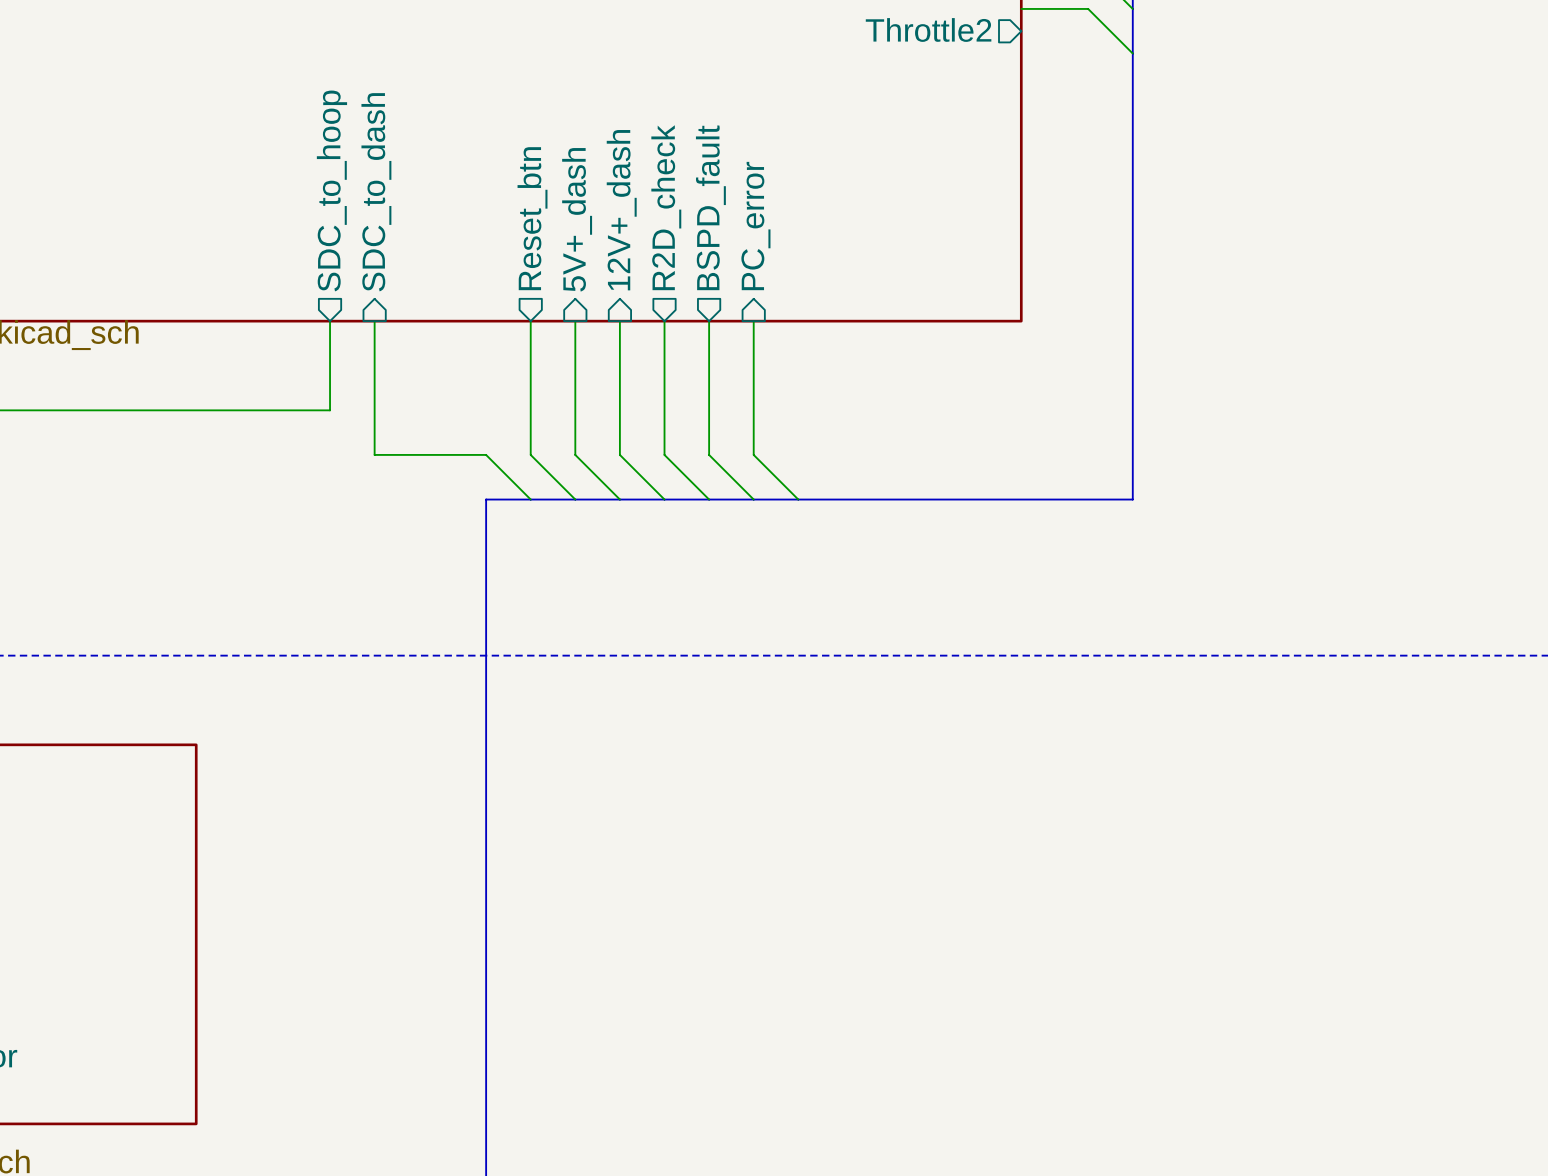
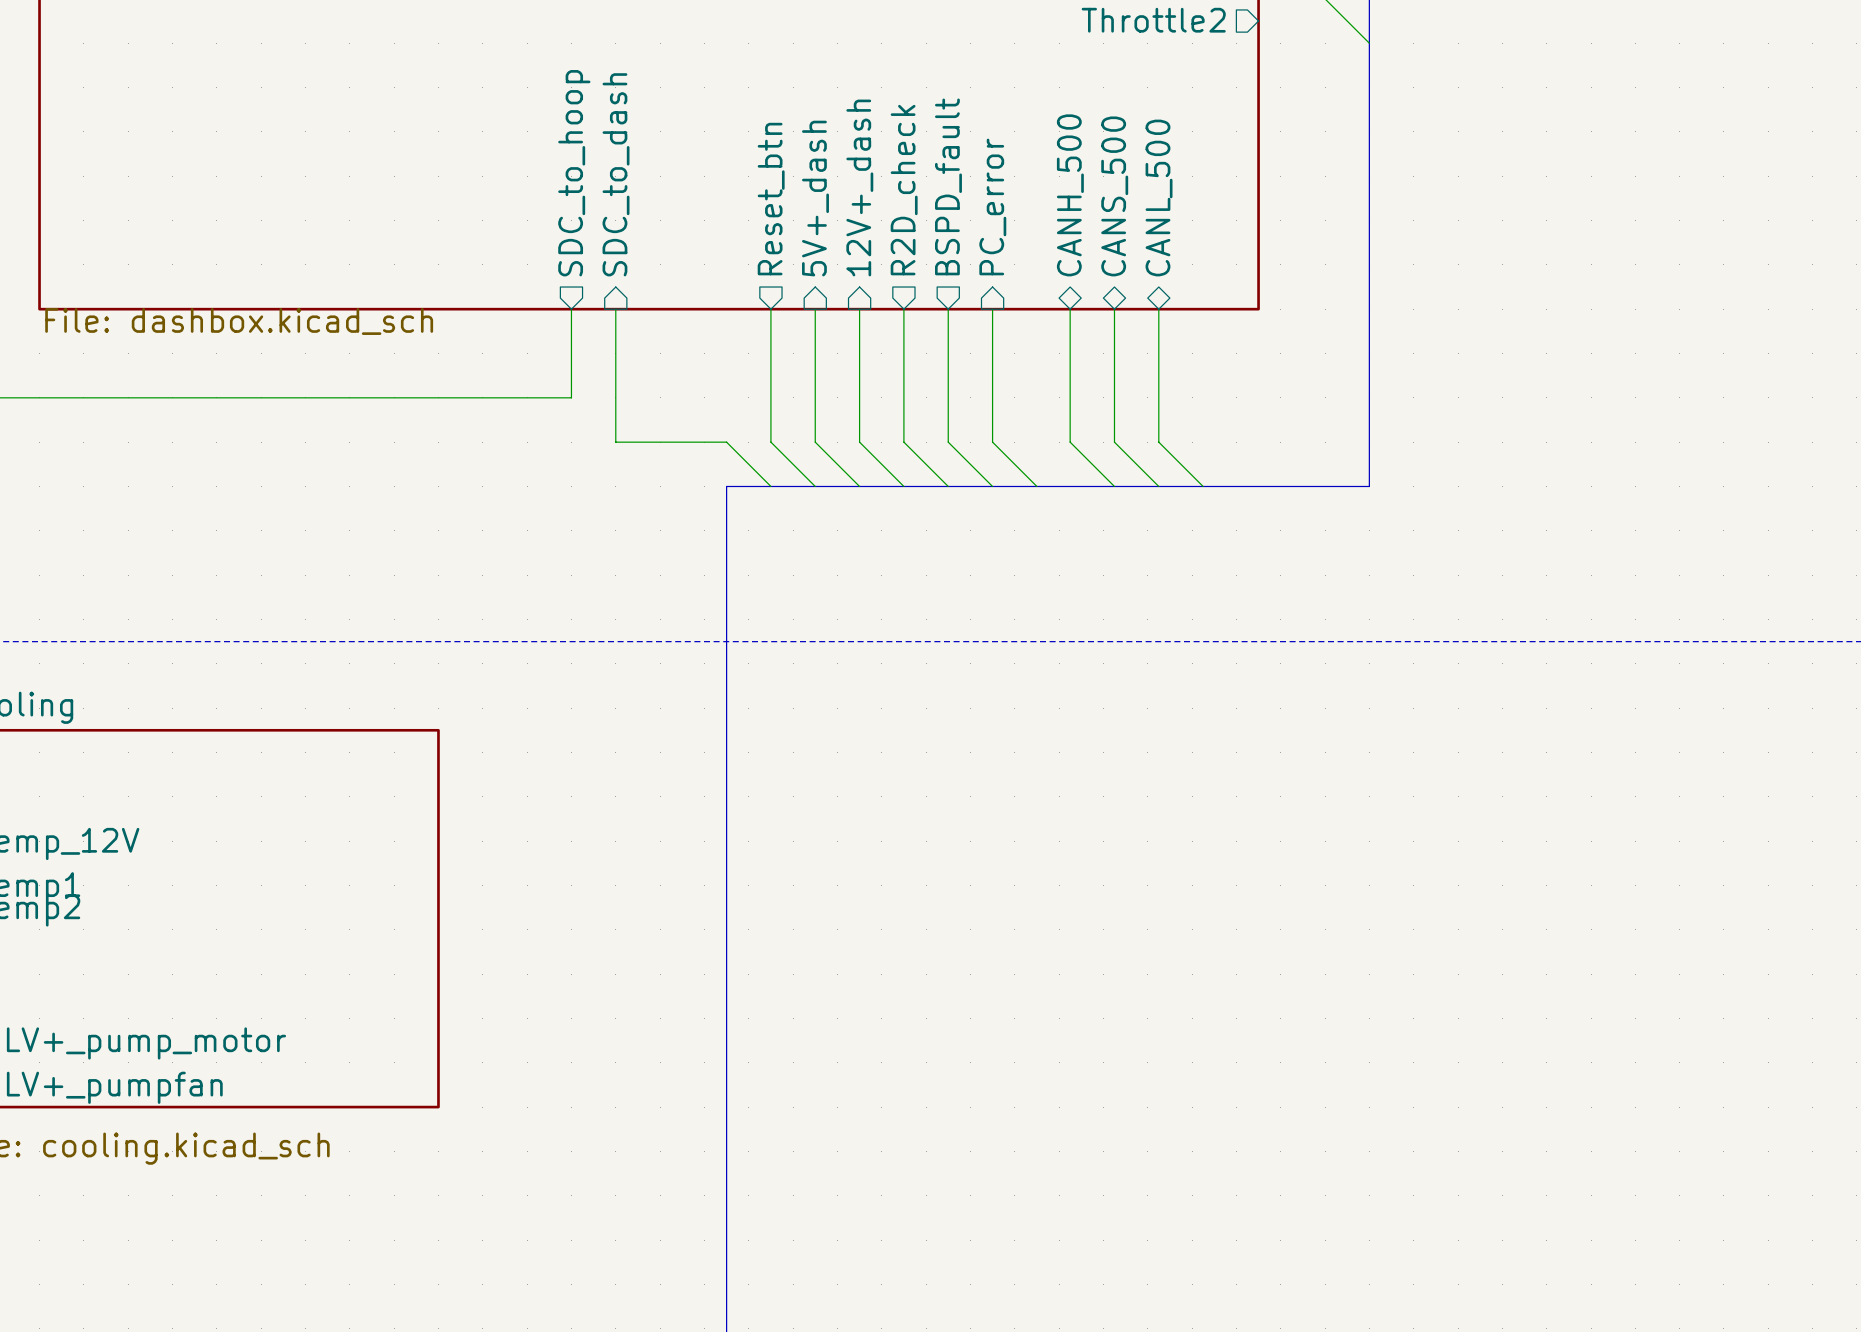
sheet pin: none -> CANH_500 (1070, 195)
sheet pin: none -> CANS_500 (1114, 196)
sheet pin: none -> CANL_500 (1159, 198)
wire: none -> (1070, 309) (1070, 442) (1114, 486)
wire: none -> (1114, 309) (1114, 442) (1158, 486)
wire: none -> (1158, 309) (1158, 442) (1203, 486)

